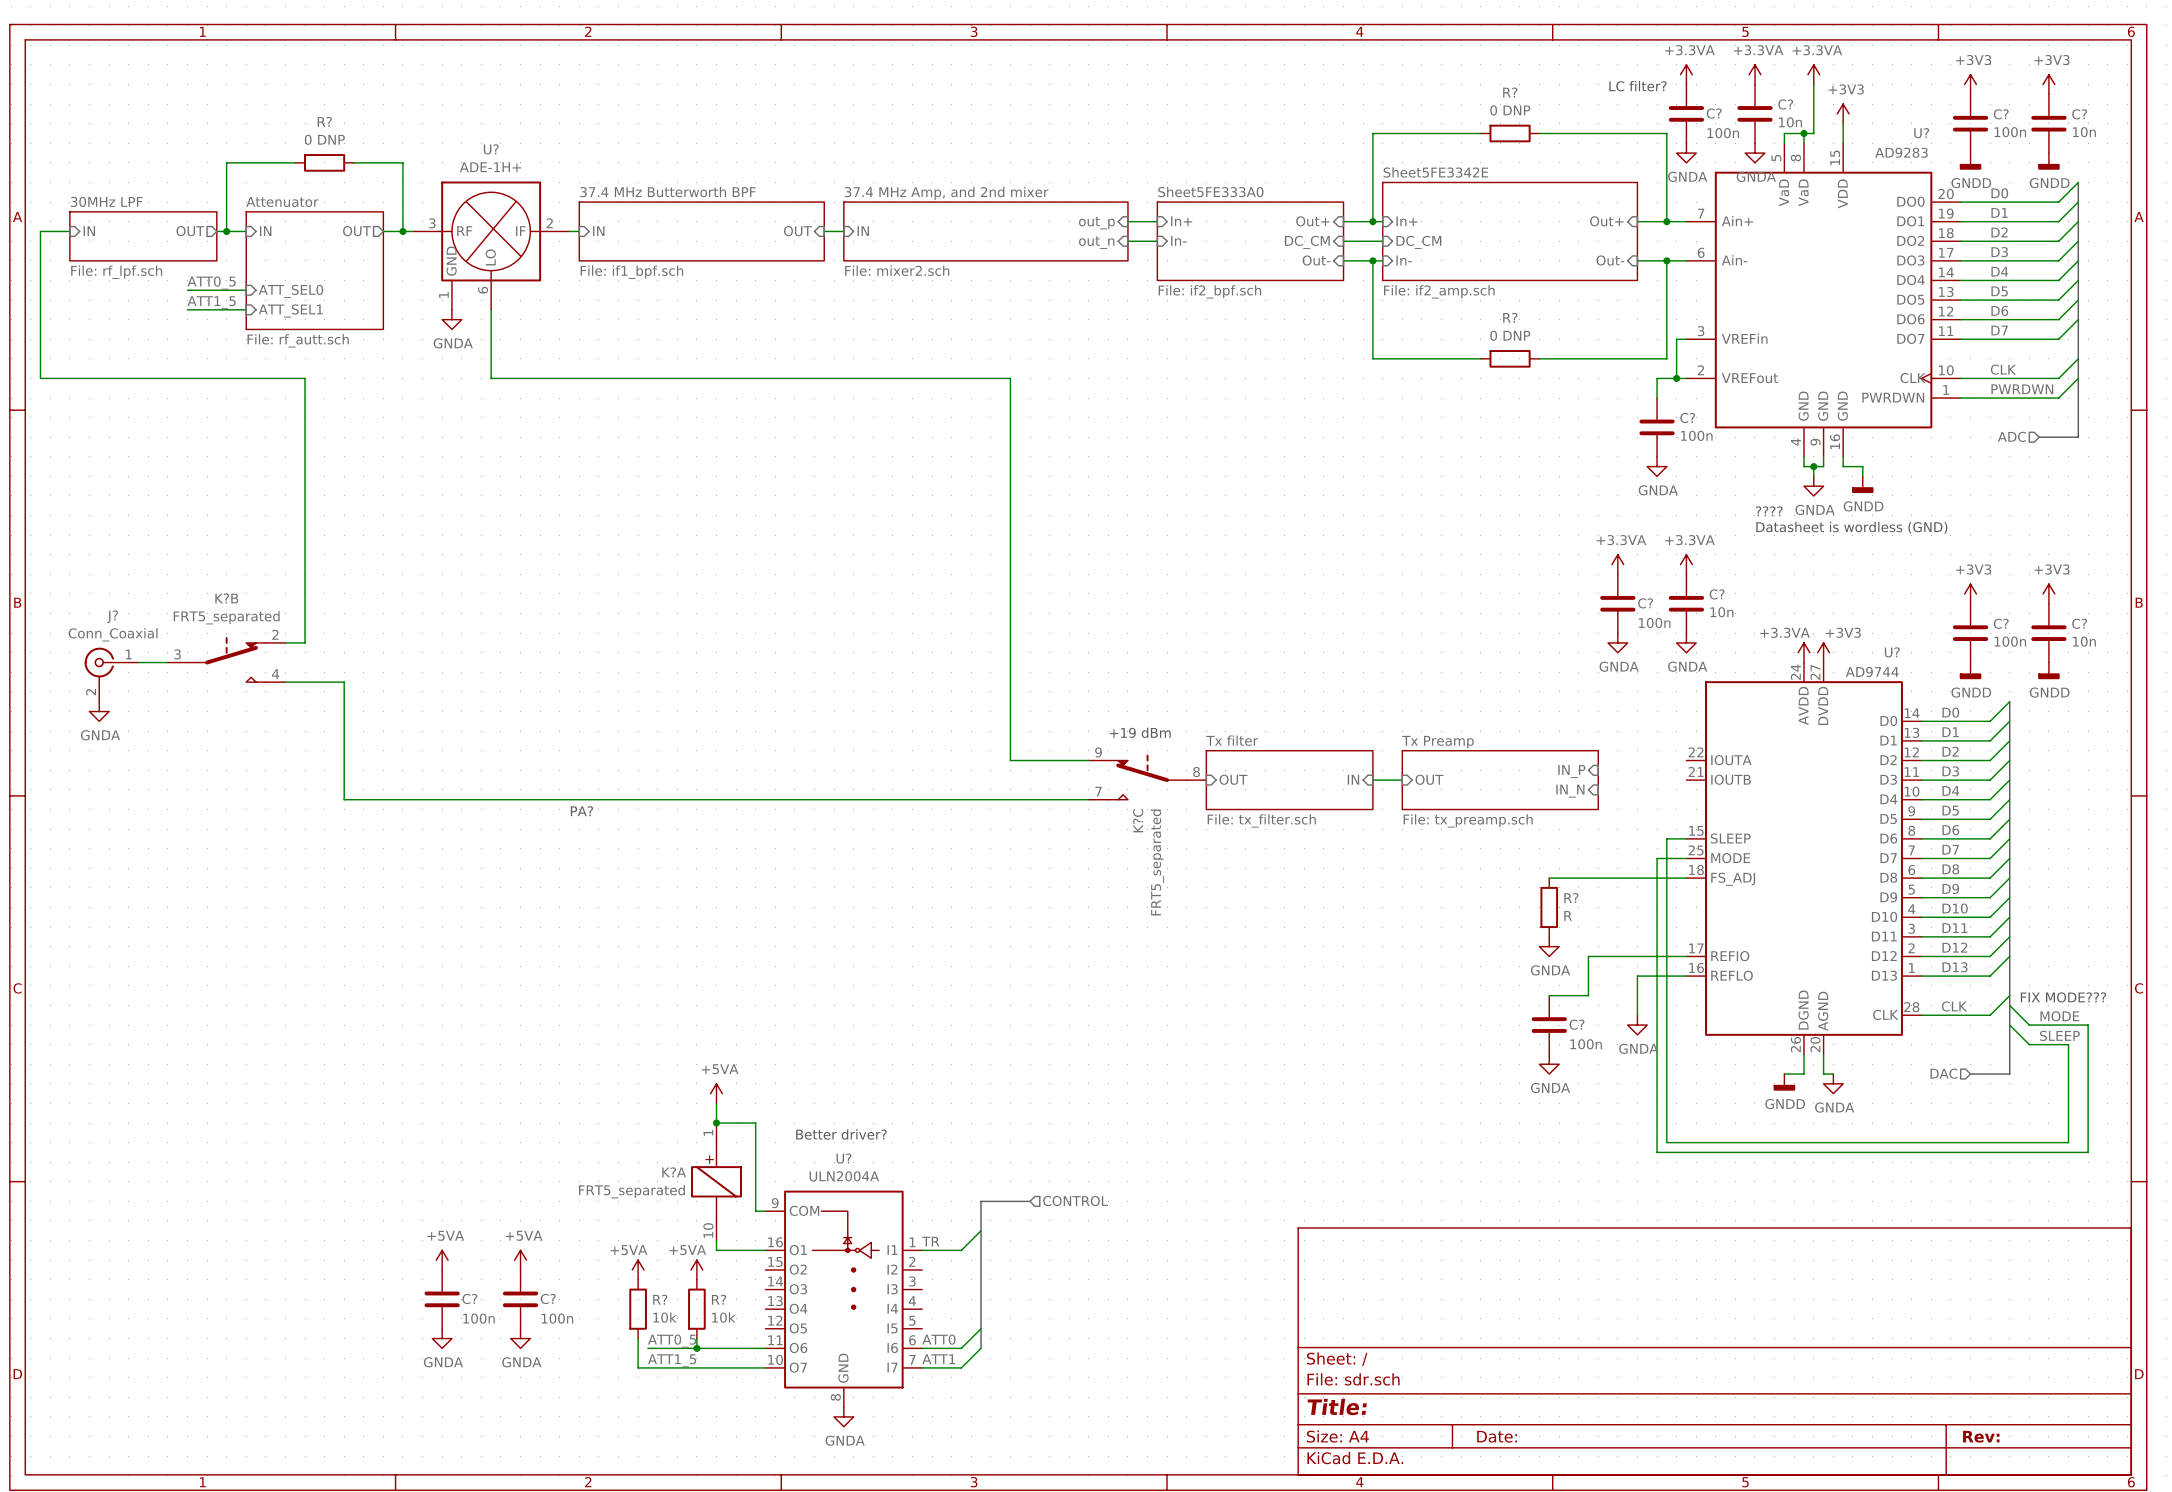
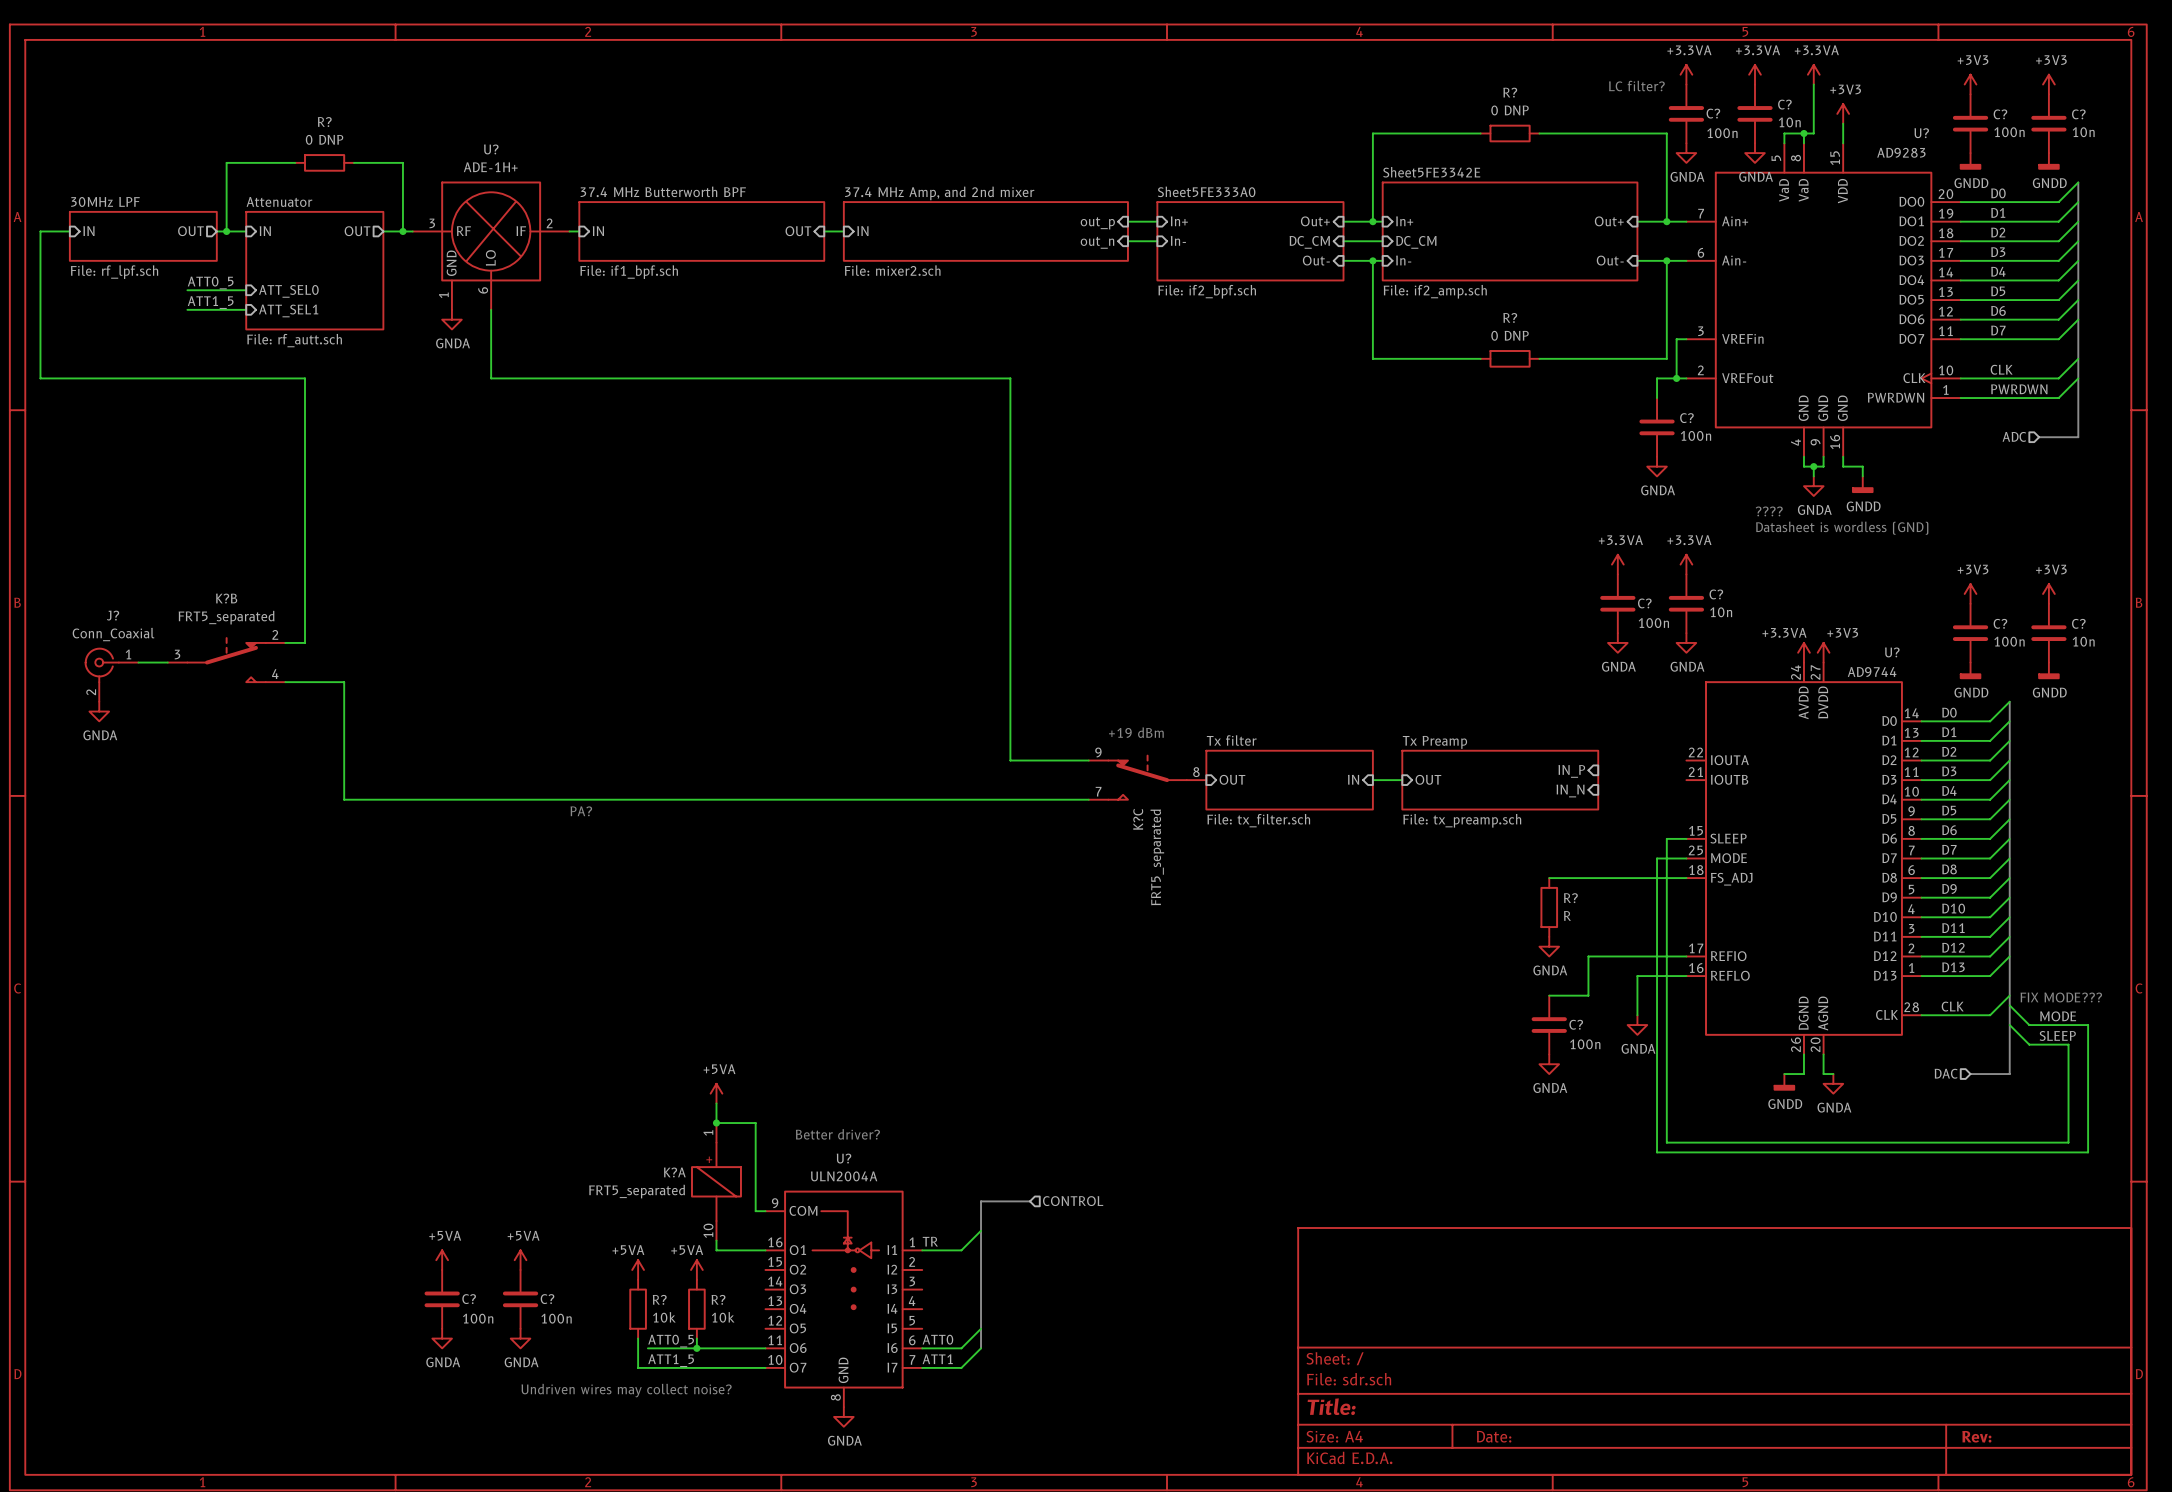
text: none -> Undriven wires may collect noise? (626, 1390)

